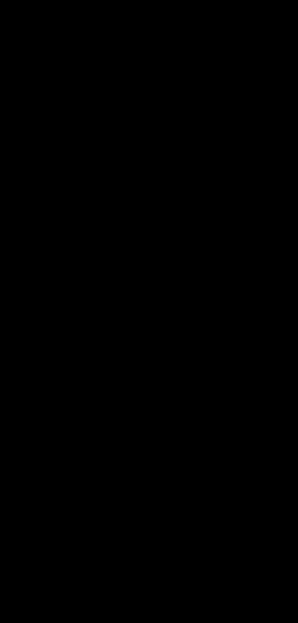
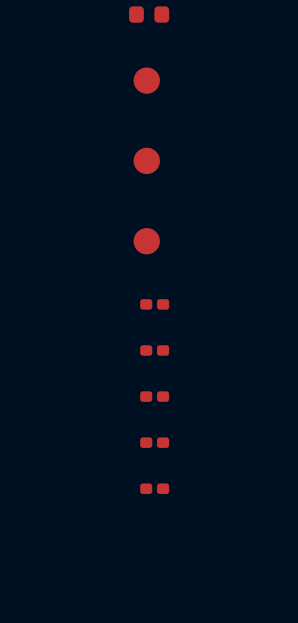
part: none -> (149, 14)
part: none -> (146, 80)
part: none -> (146, 160)
part: none -> (146, 241)
part: none -> (154, 304)
part: none -> (154, 350)
part: none -> (154, 396)
part: none -> (154, 442)
part: none -> (154, 488)

